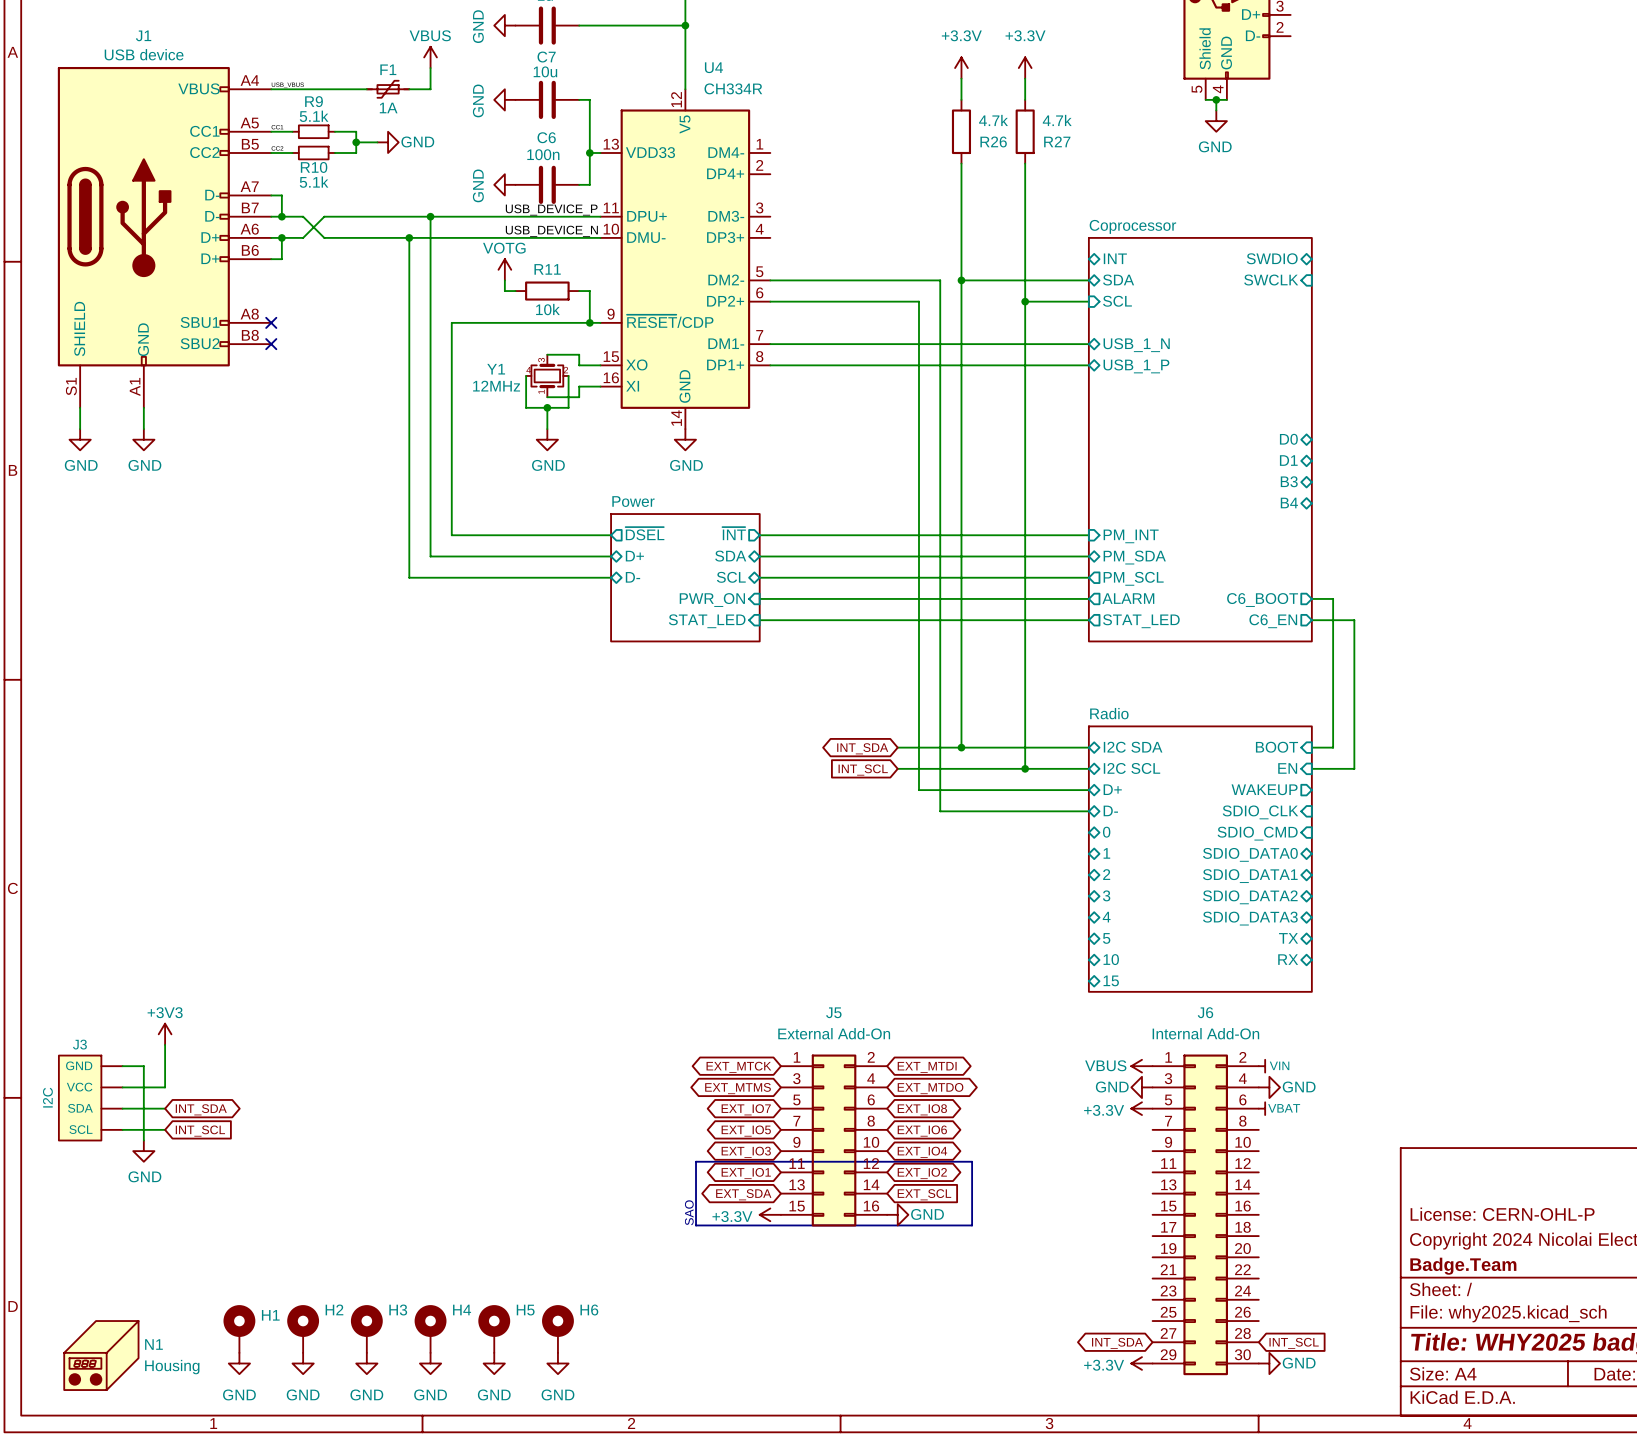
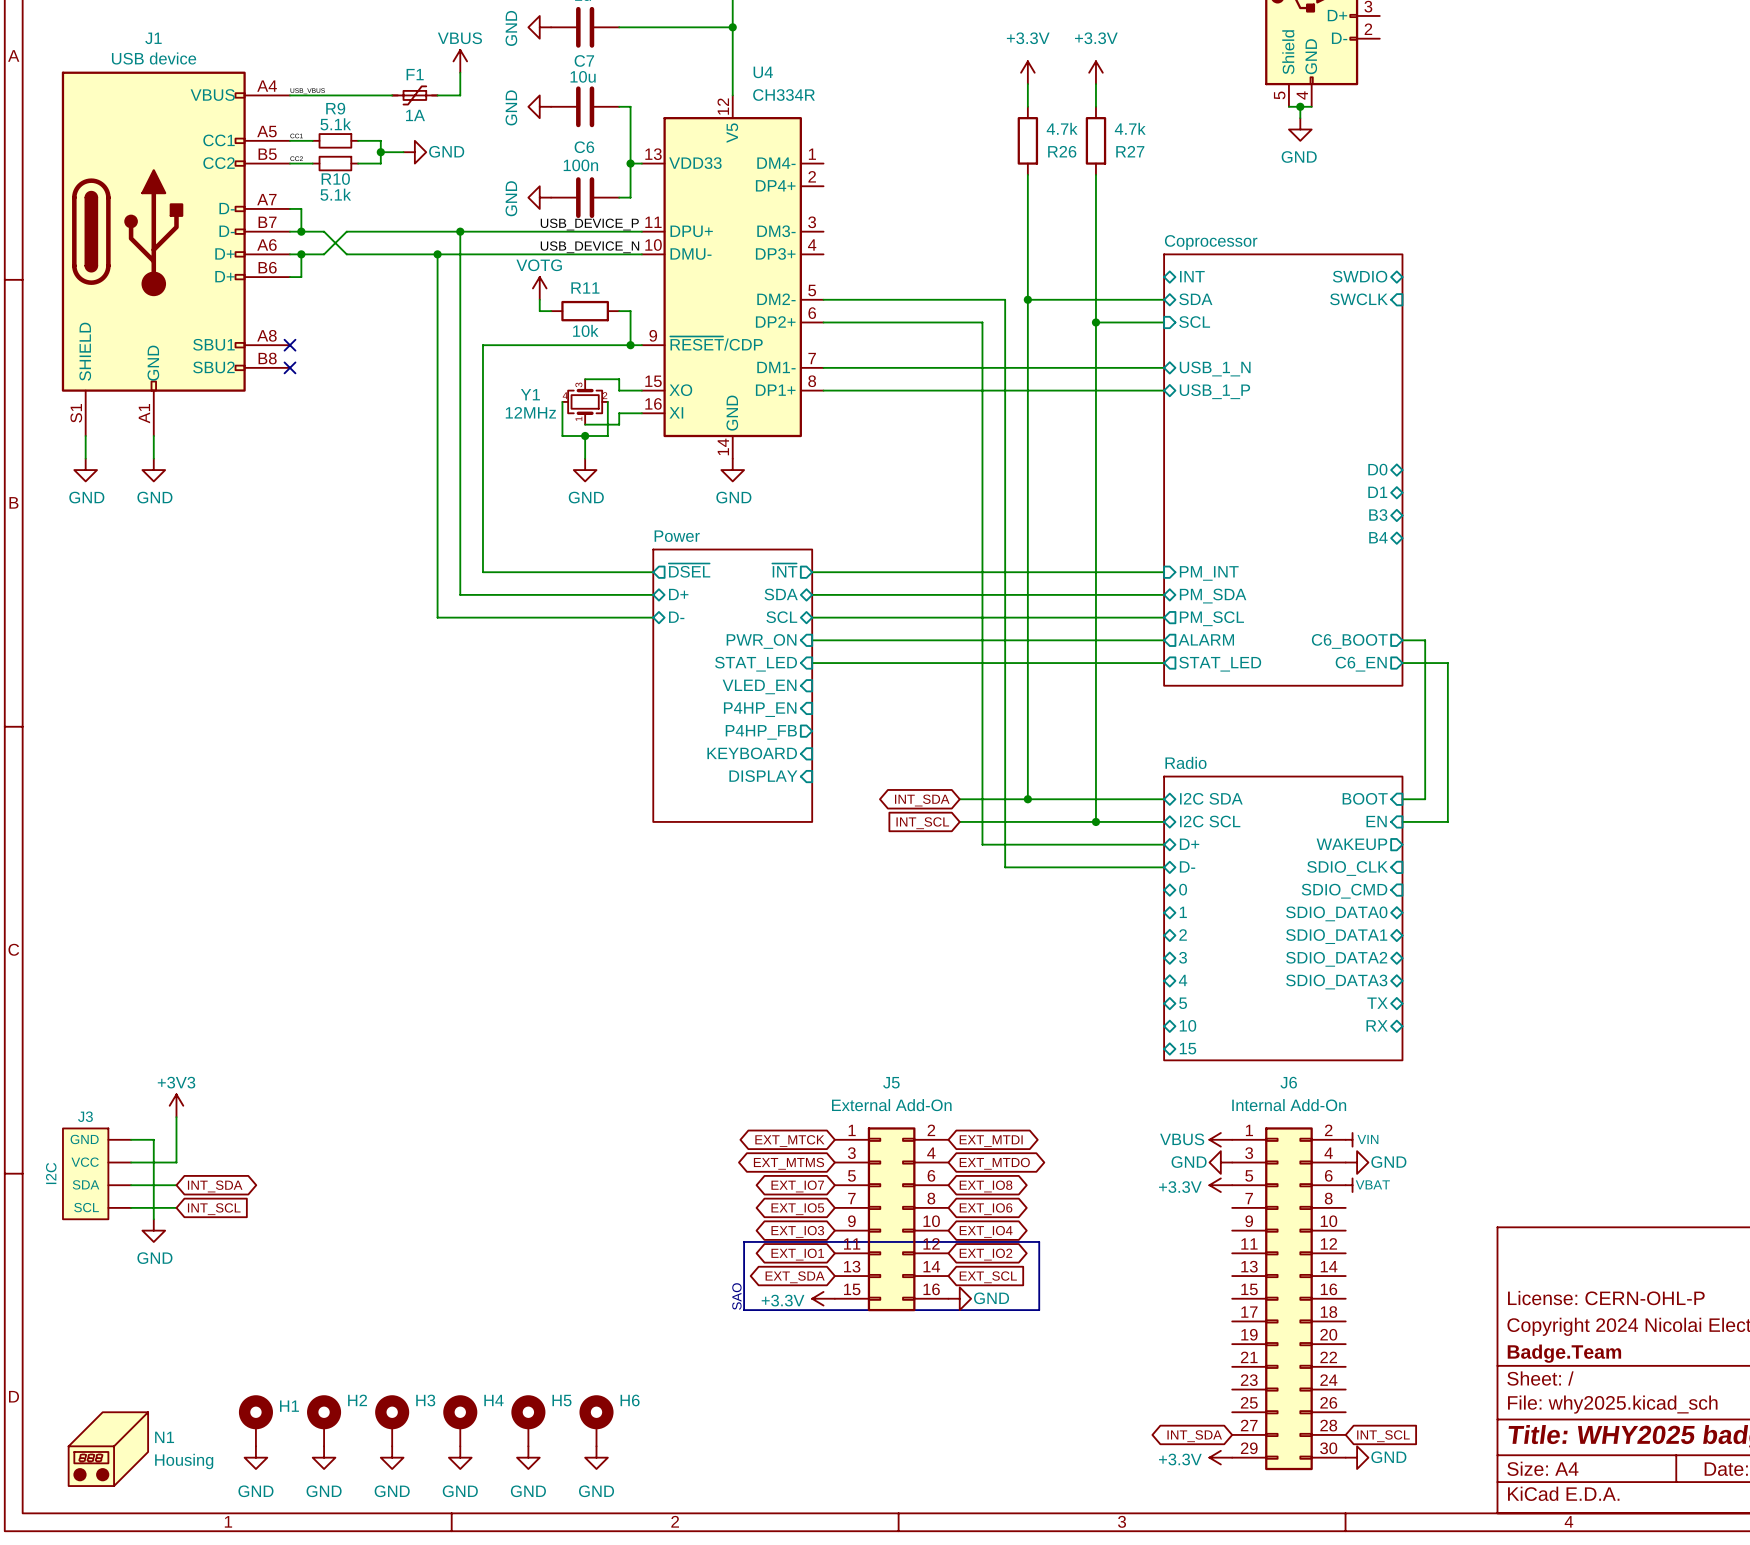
sheet Power: (685, 577) -> none
sheet Power: none -> (732, 685)
sheet pin: none -> VLED_EN (759, 686)
sheet pin: none -> P4HP_EN (760, 709)
sheet pin: none -> P4HP_FB (761, 732)
sheet pin: none -> KEYBOARD (752, 753)
sheet pin: none -> DISPLAY (763, 776)

